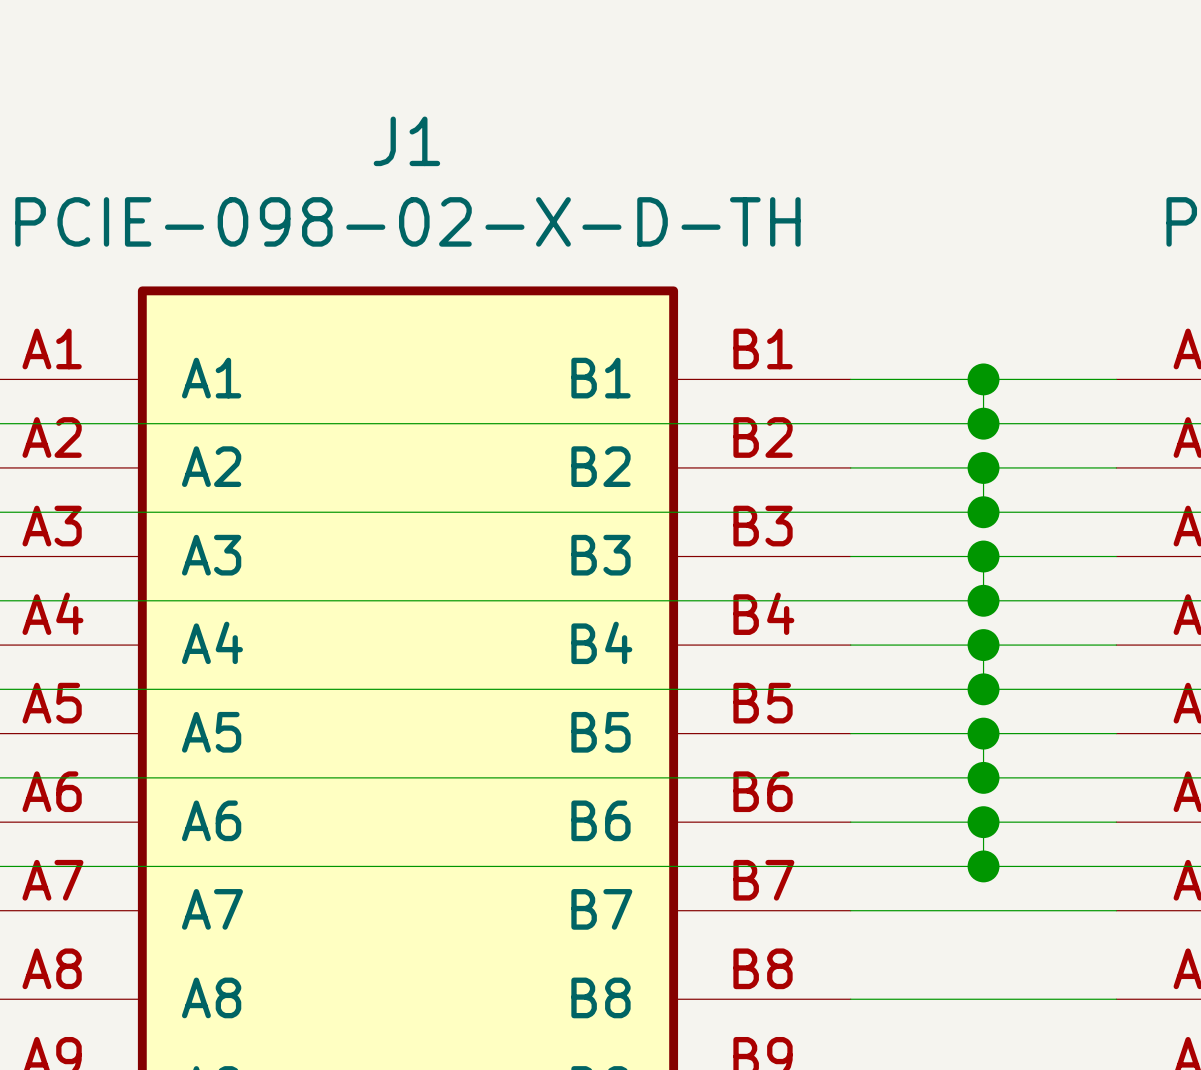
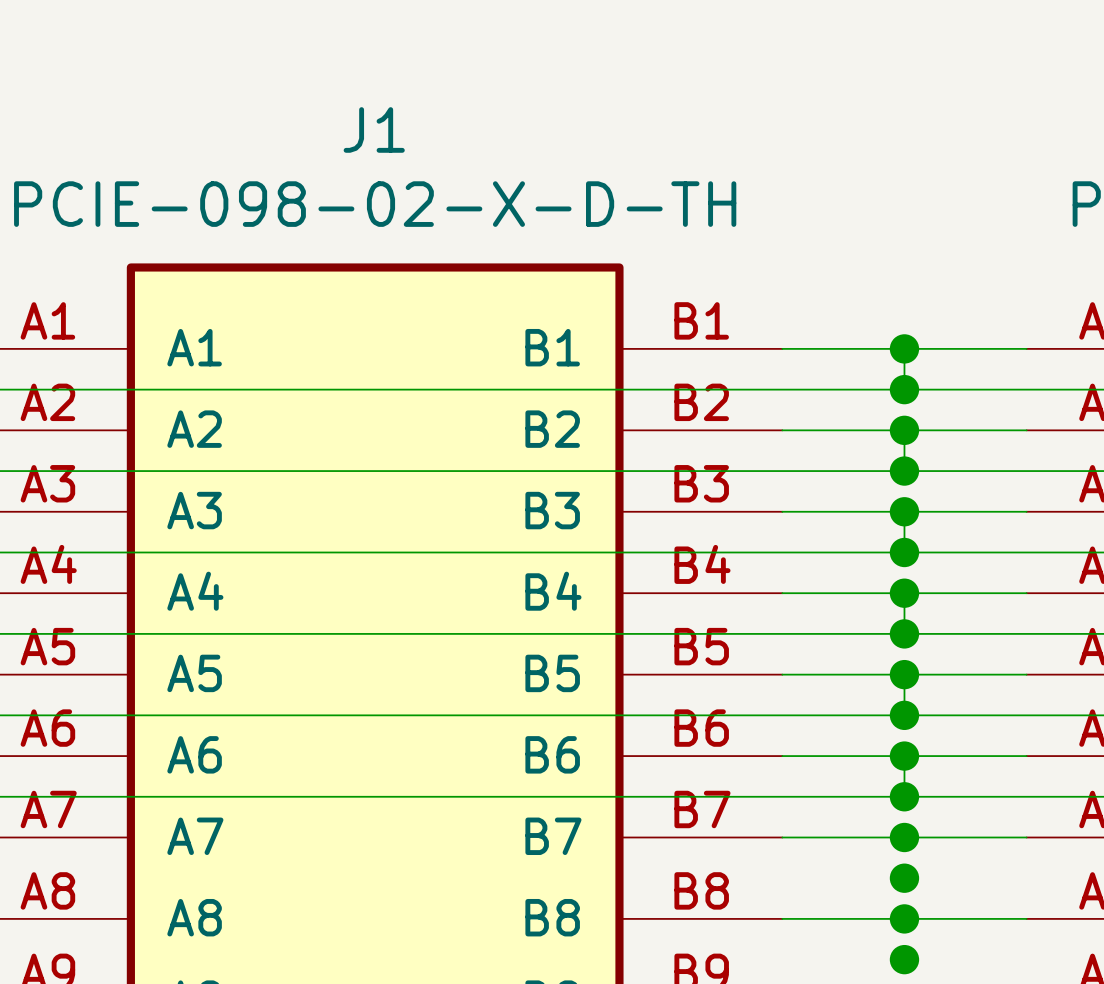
junction: none -> (904, 837)
junction: none -> (904, 878)
junction: none -> (904, 918)
junction: none -> (904, 959)

